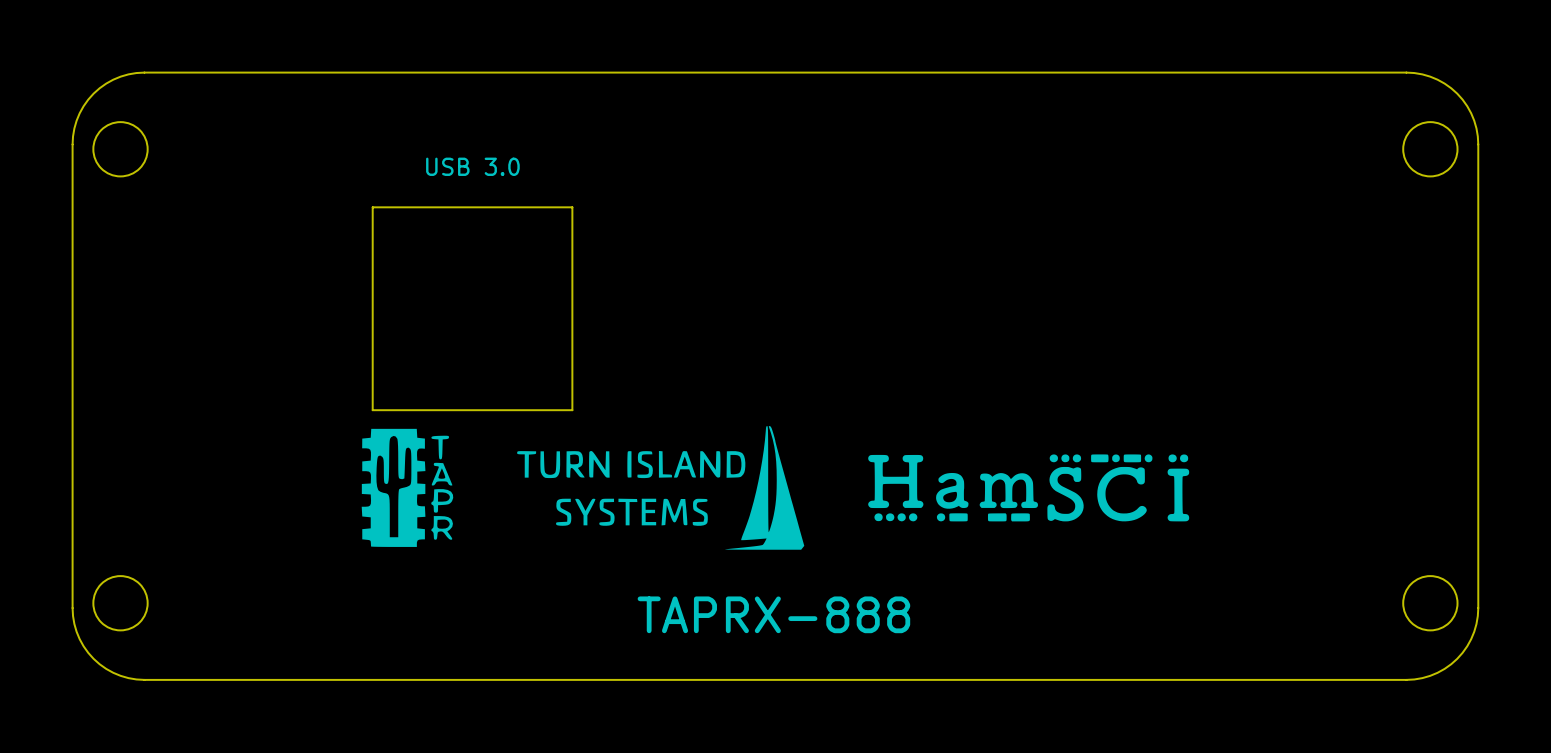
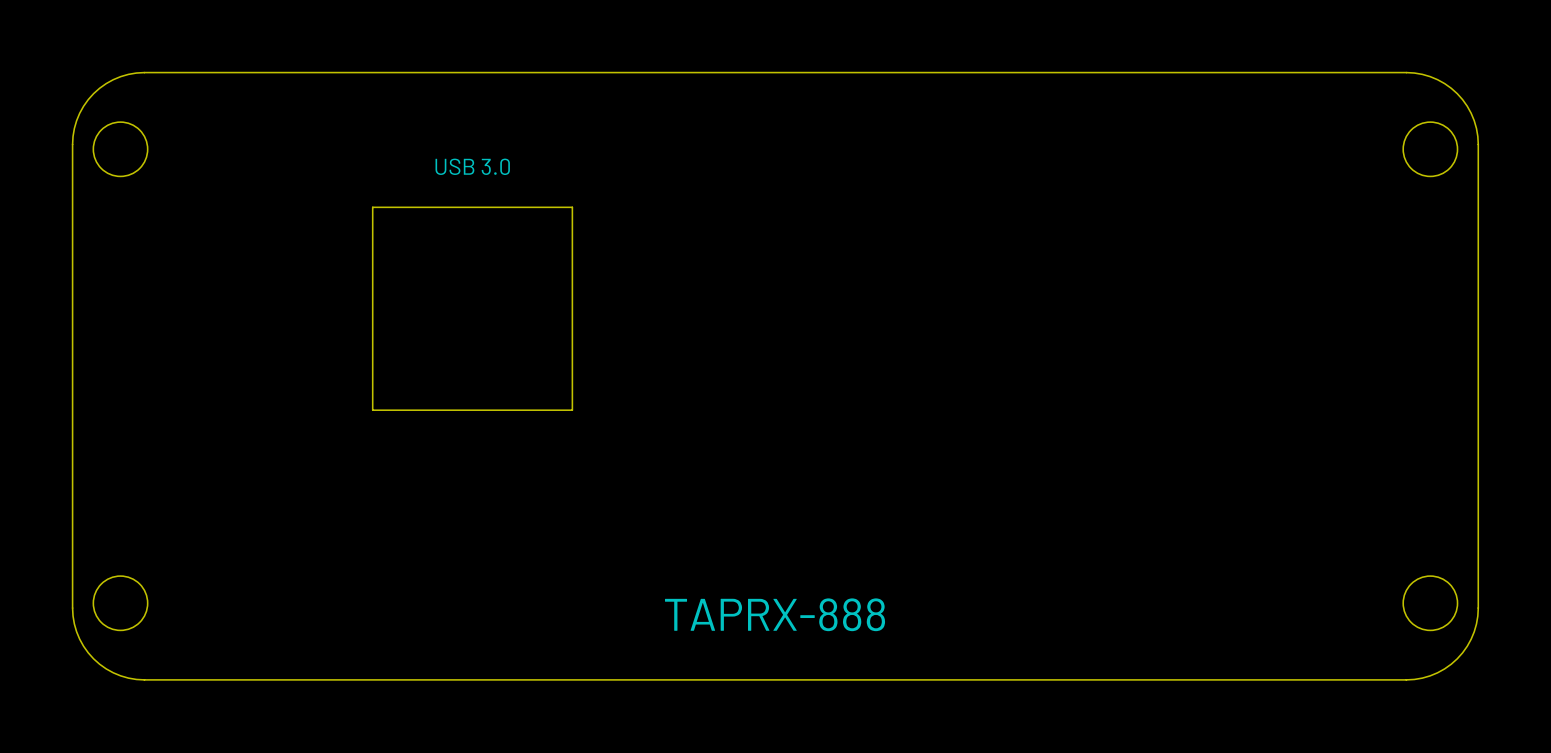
drawing: [517, 426, 805, 550] -> none
drawing: [361, 428, 454, 547] -> none
drawing: [868, 454, 1190, 522] -> none

